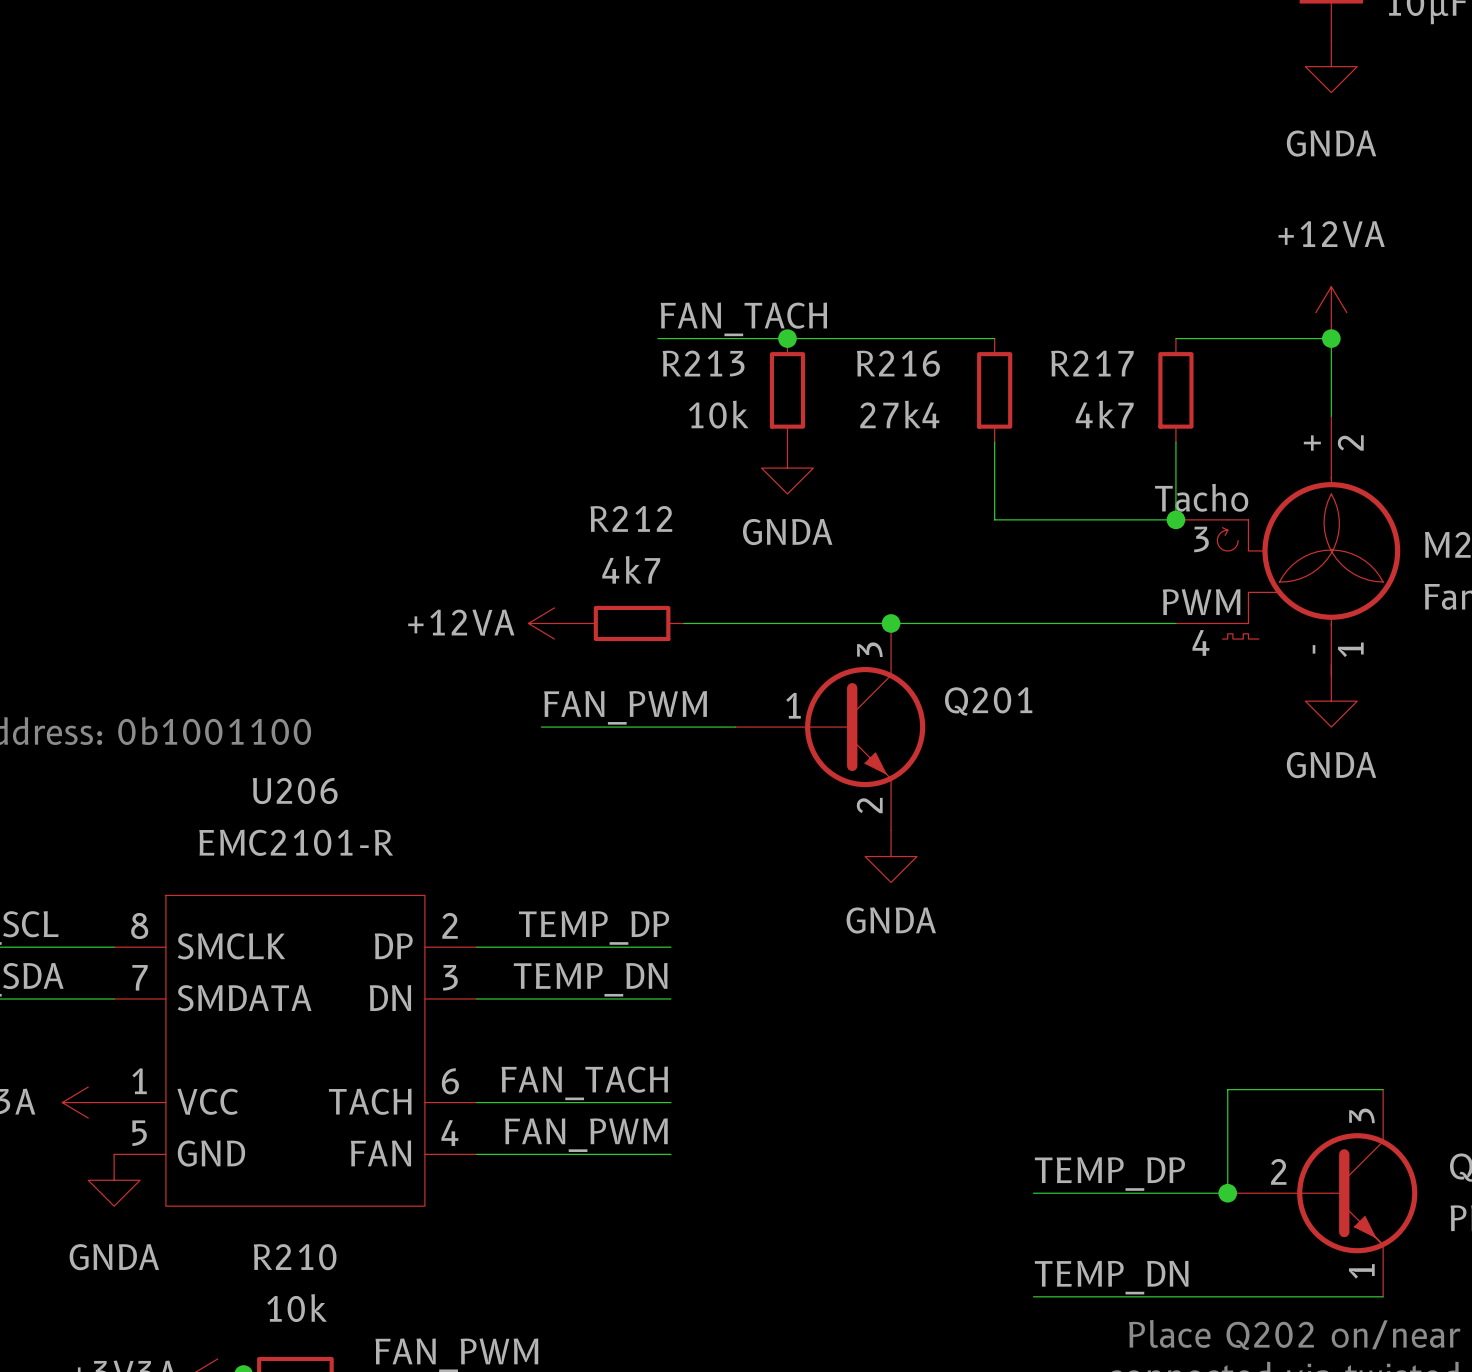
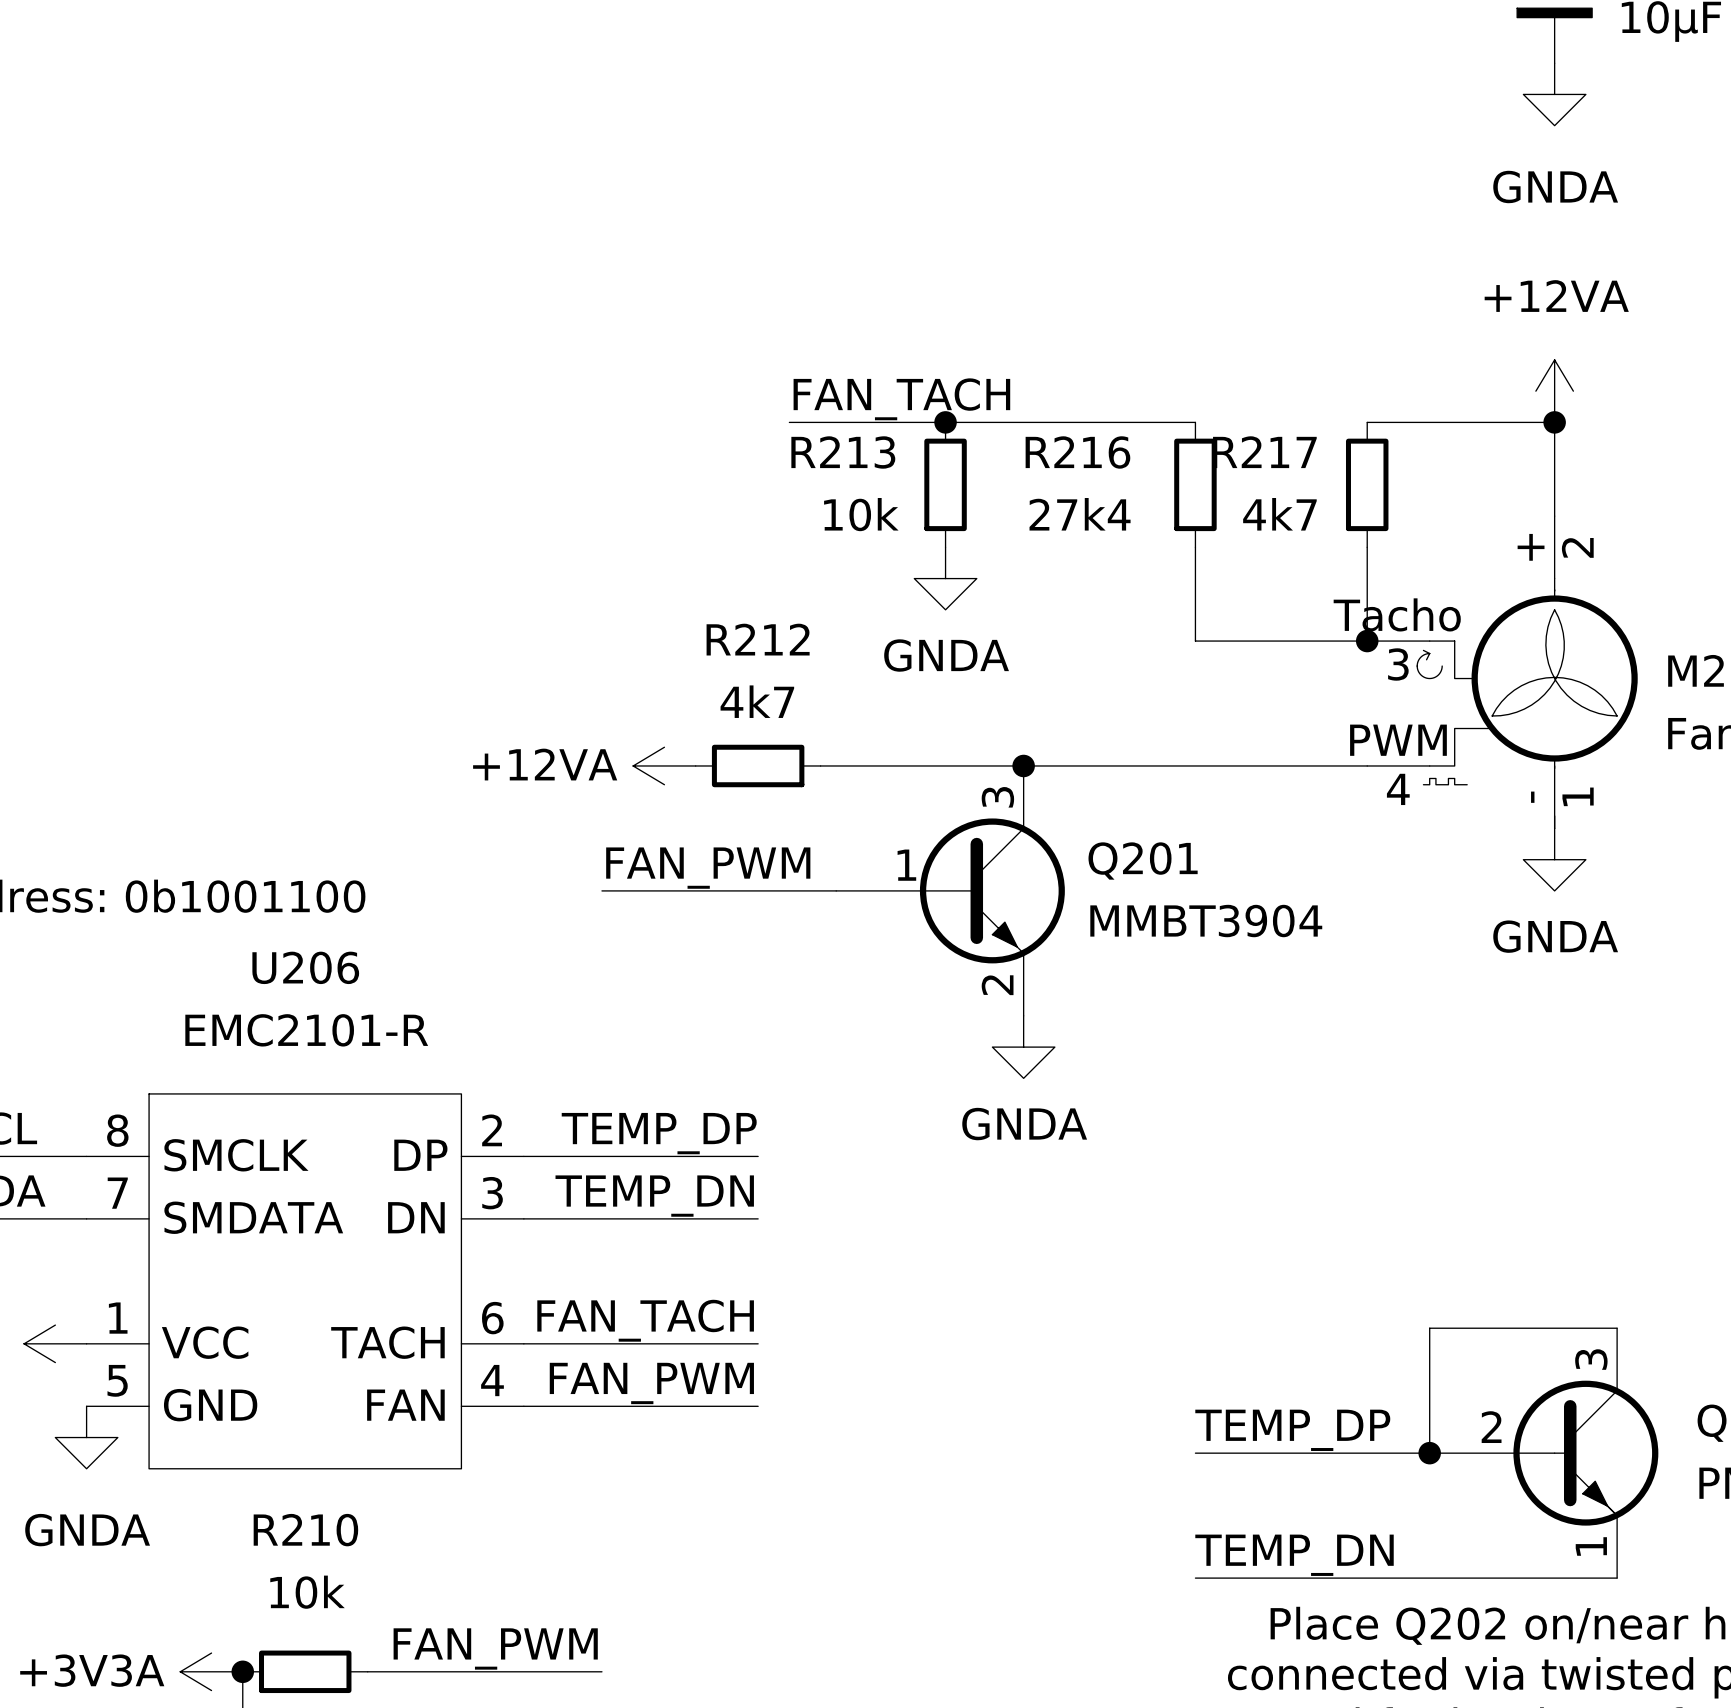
label position: FAN_TACH (743, 319) -> FAN_TACH (901, 399)
wire: (657, 338) (696, 338) -> (1148, 422) (1195, 422)
junction position: (787, 338) -> (945, 422)
R213 position: (787, 390) -> (945, 484)
R216 position: (994, 390) -> (1195, 484)
wire: (994, 442) (994, 519) (1033, 519) -> (1195, 547) (1195, 641)
power symbol position: GNDA (787, 468) -> GNDA (945, 578)
power symbol position: +12VA (554, 623) -> +12VA (664, 765)
R212 position: (632, 623) -> (758, 765)
wire: (683, 623) (722, 623) -> none
Q201 value: none -> MMBT3904 (1206, 921)

